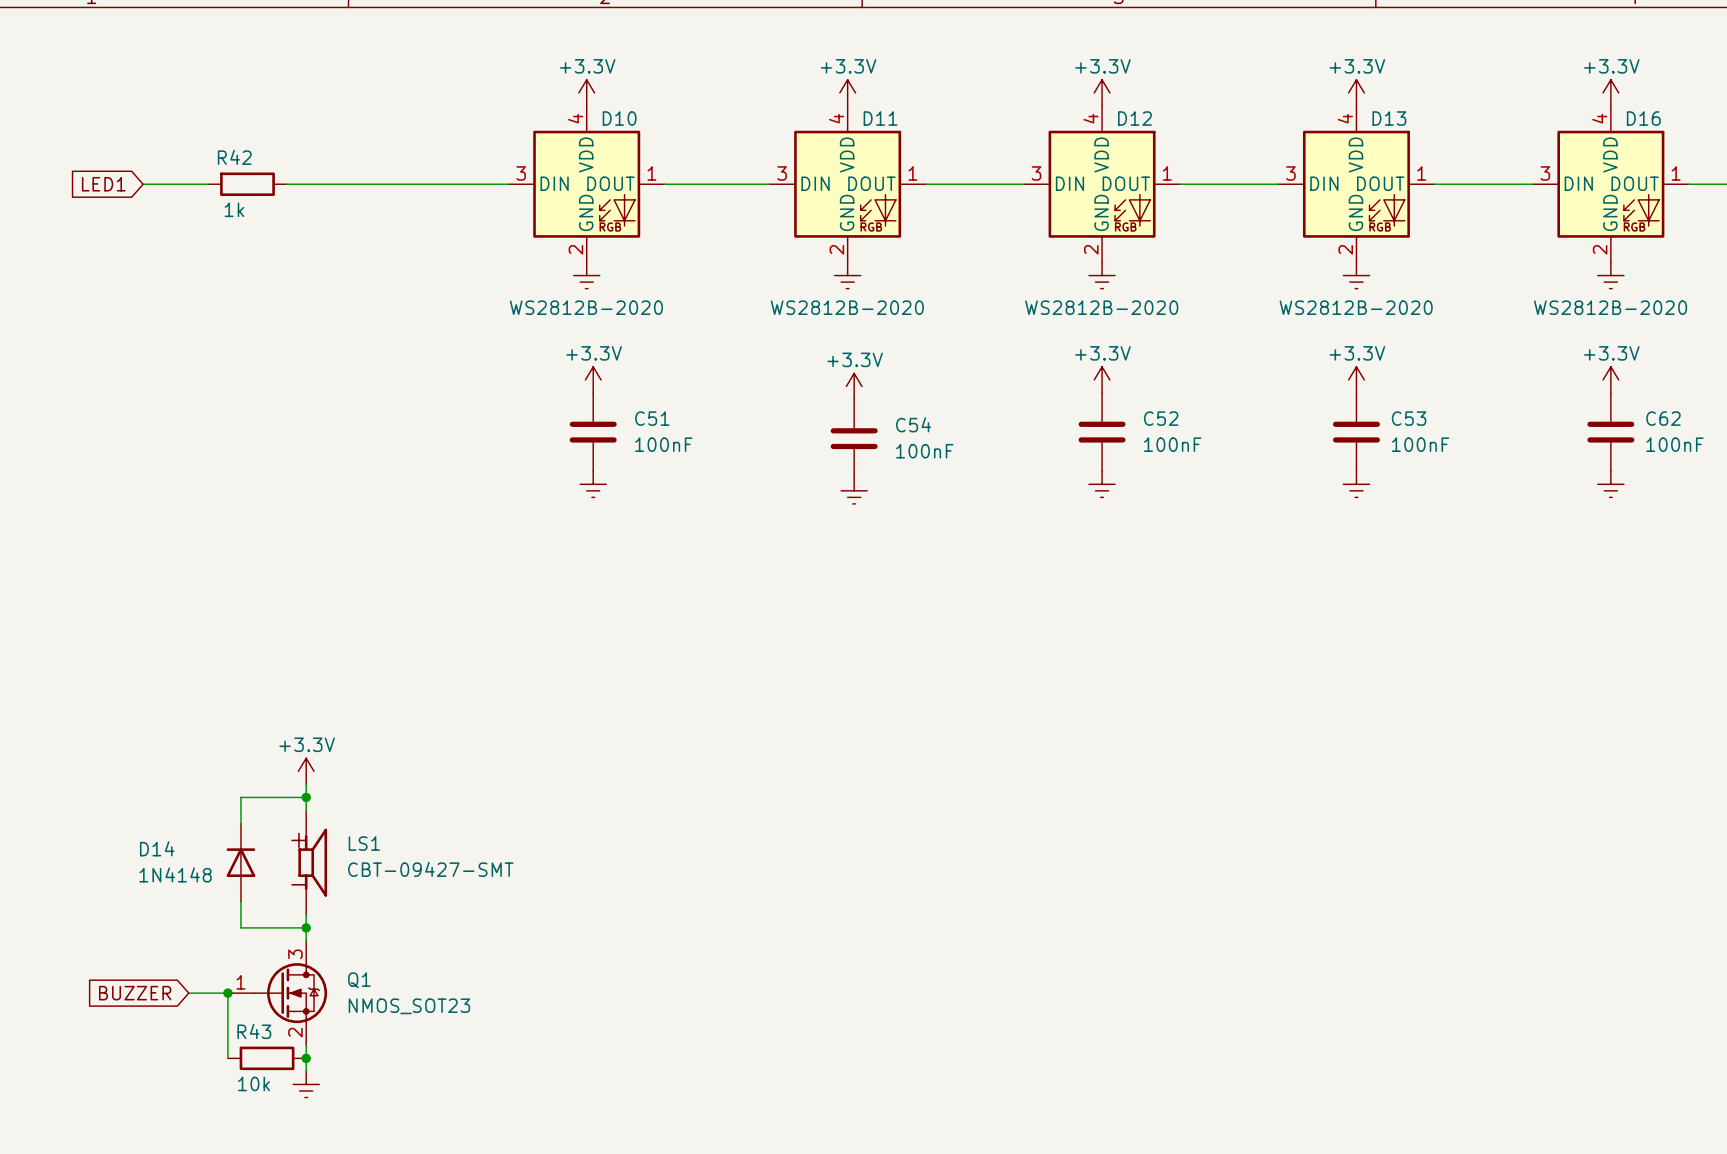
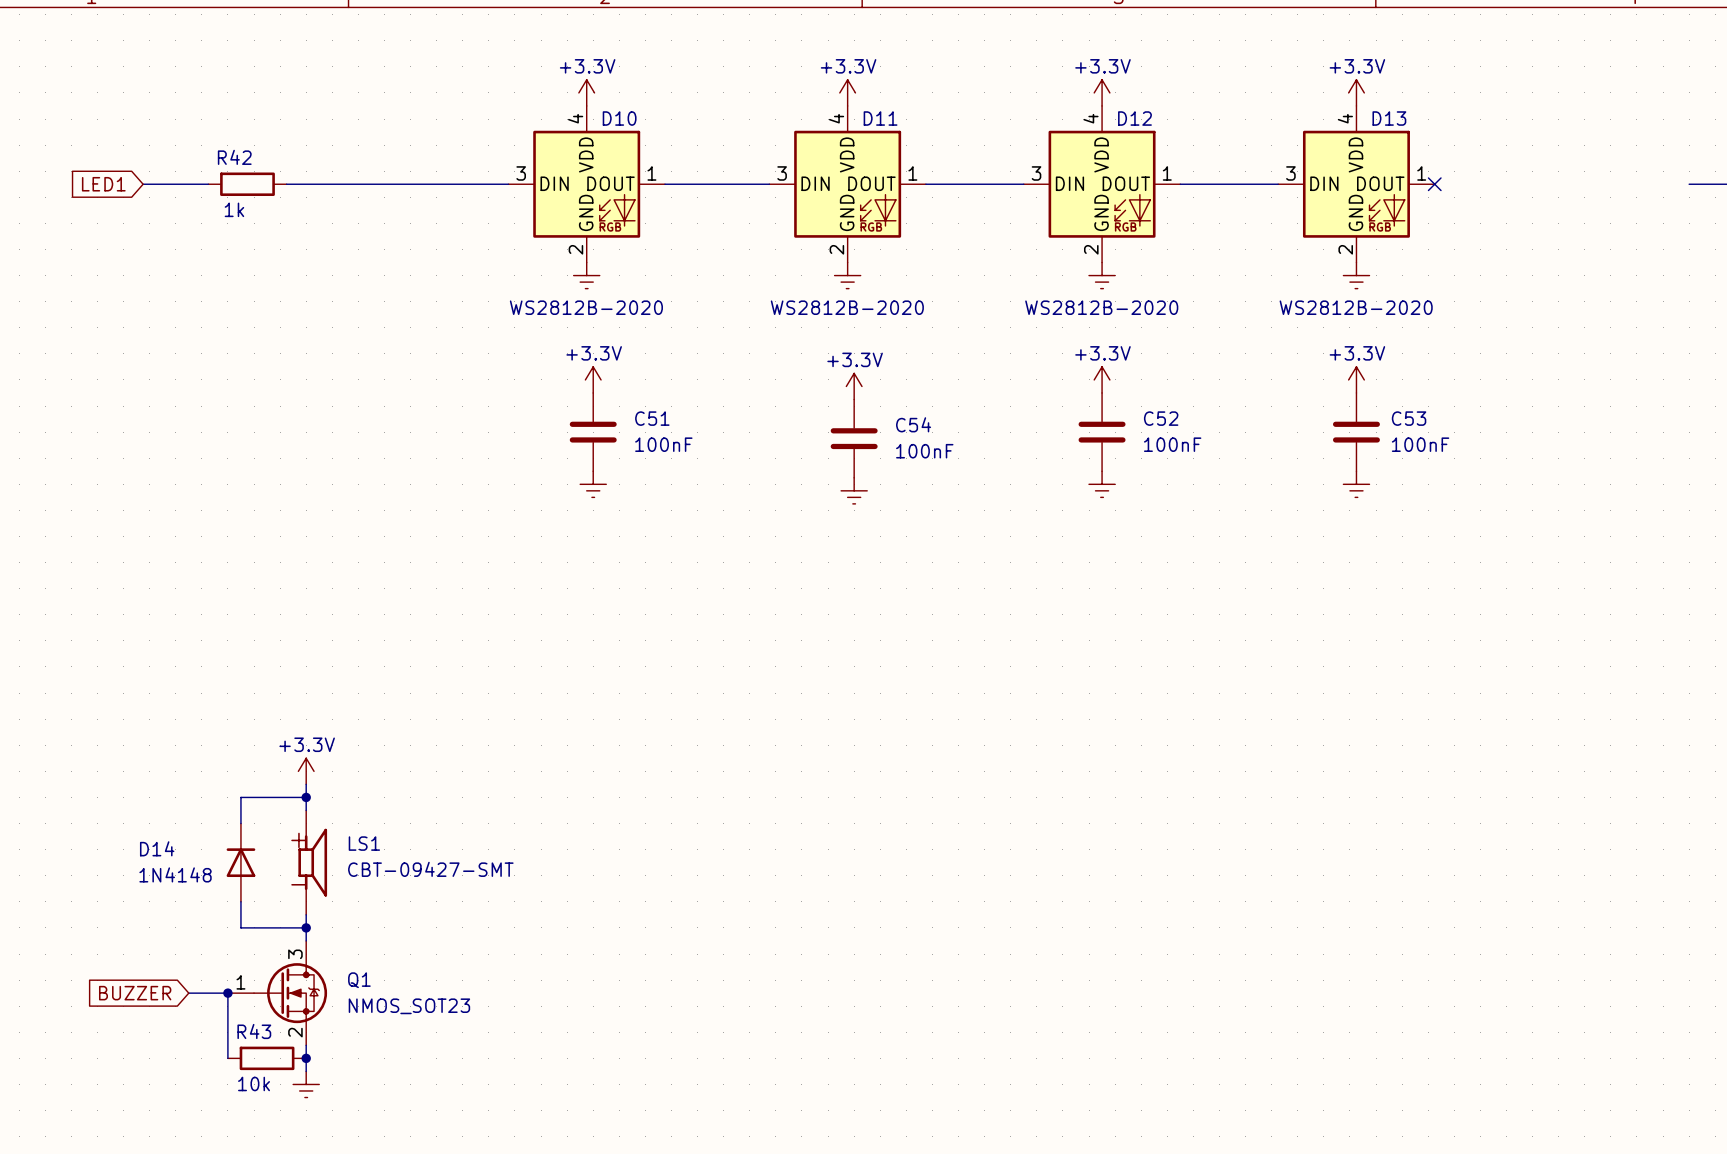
power symbol: +3.3V (1610, 92) -> none
wire: (1434, 184) (1532, 184) -> none
no-connect mark: none -> (1434, 184)
D16: WS2812B-2020 (1610, 184) -> none
power symbol: (1610, 275) -> none
power symbol: +3.3V (1610, 379) -> none
C62: 100nF (1610, 432) -> none
power symbol: (1610, 484) -> none

